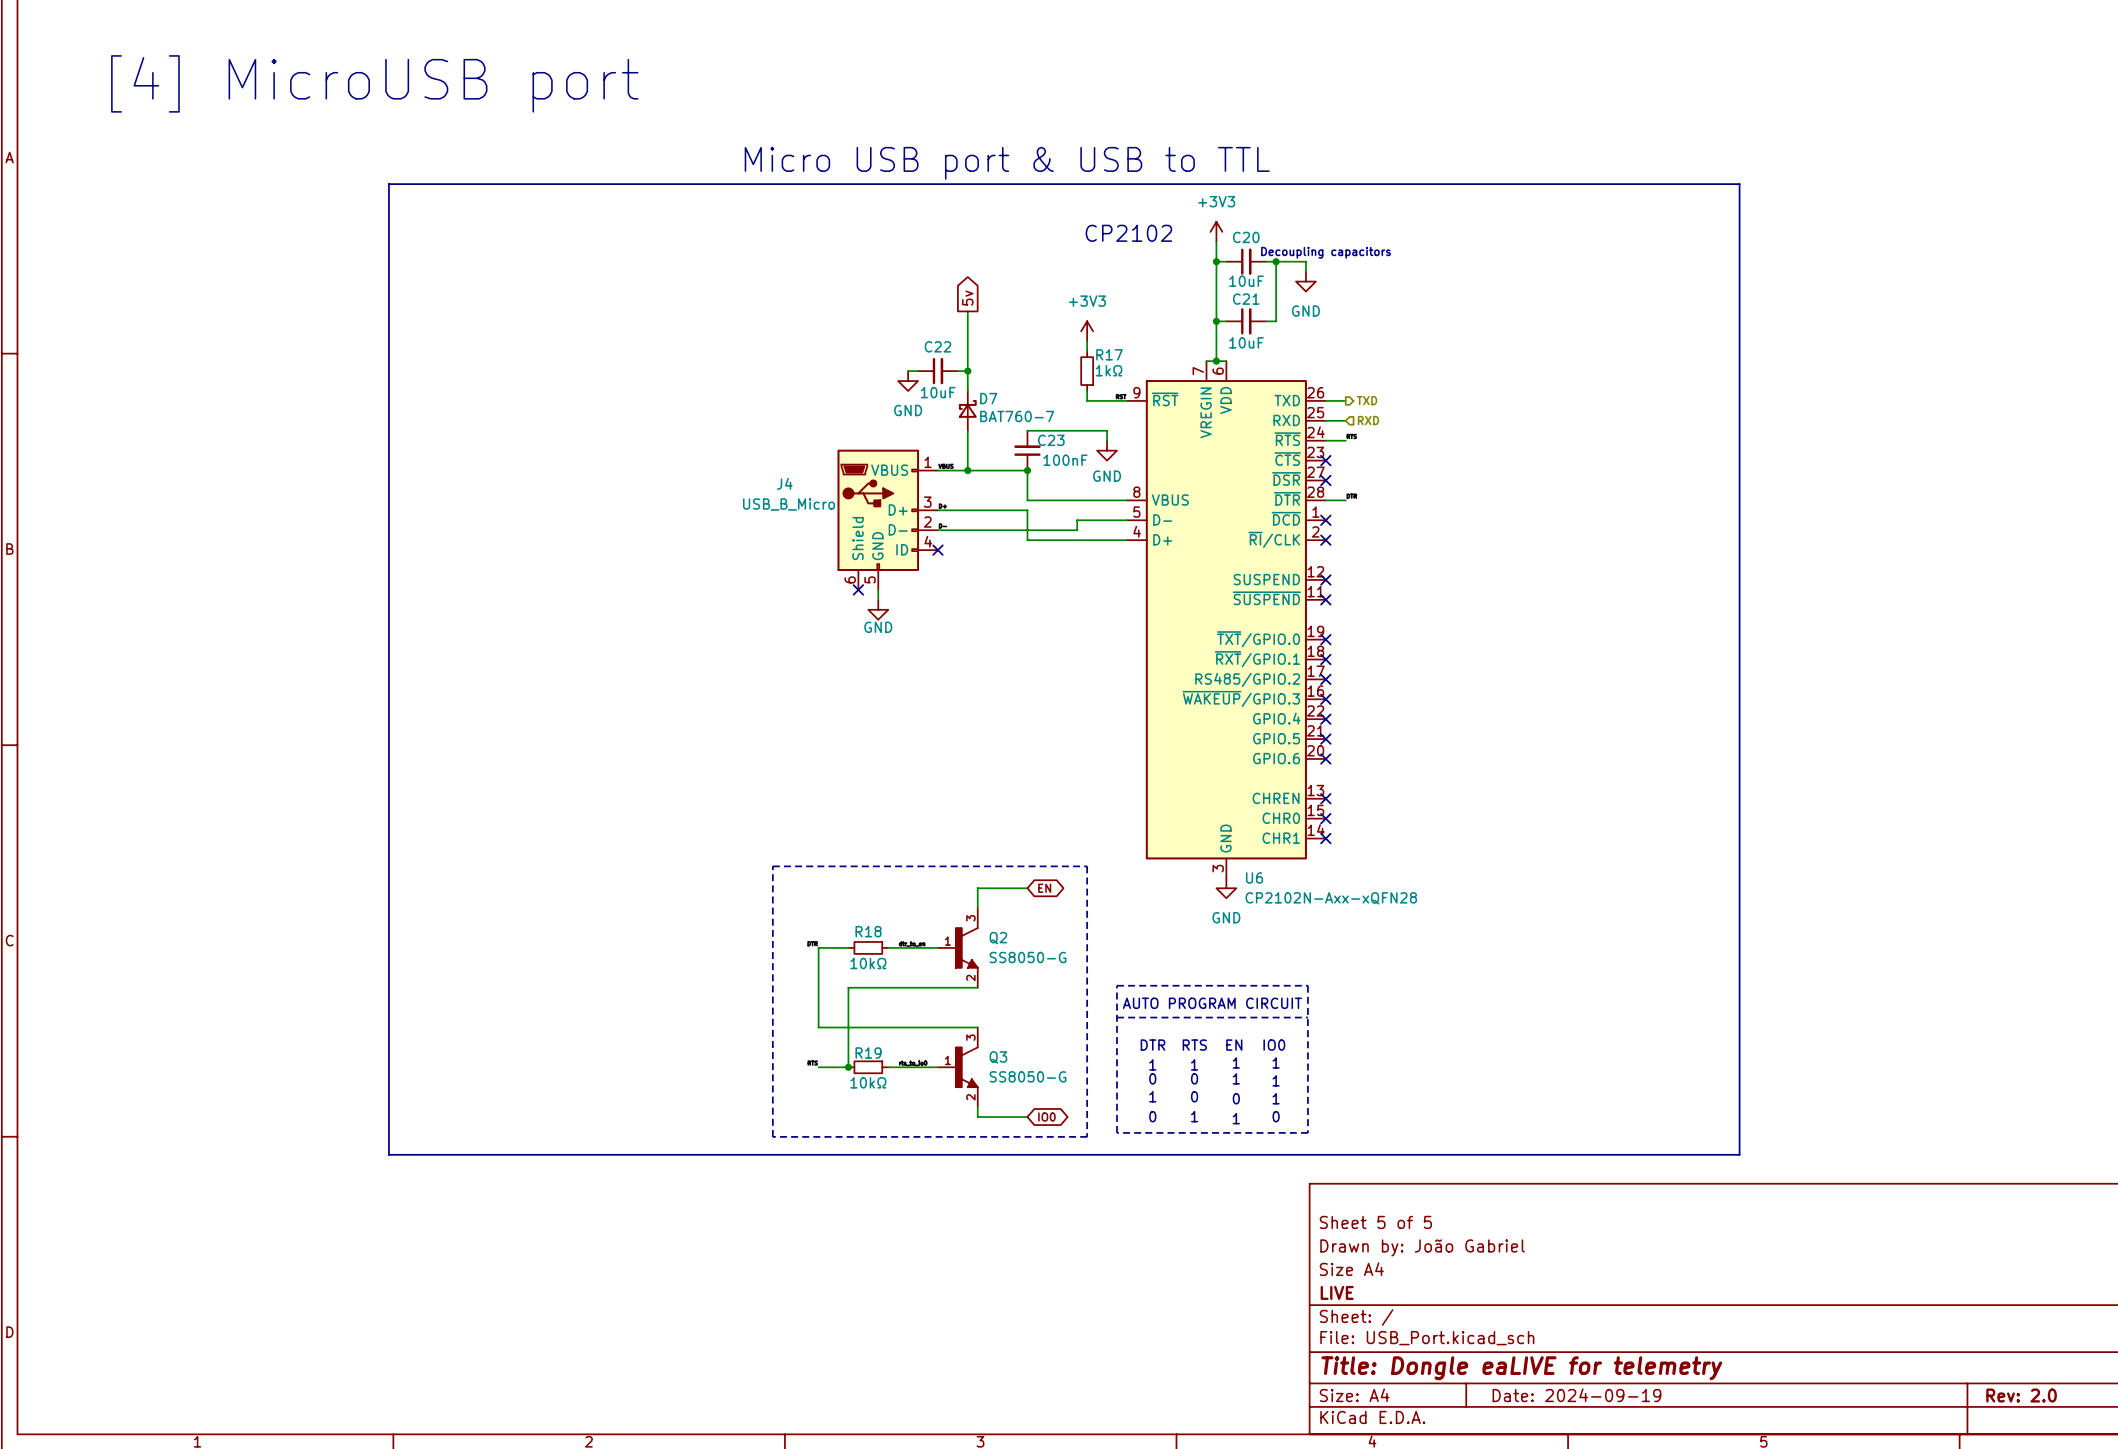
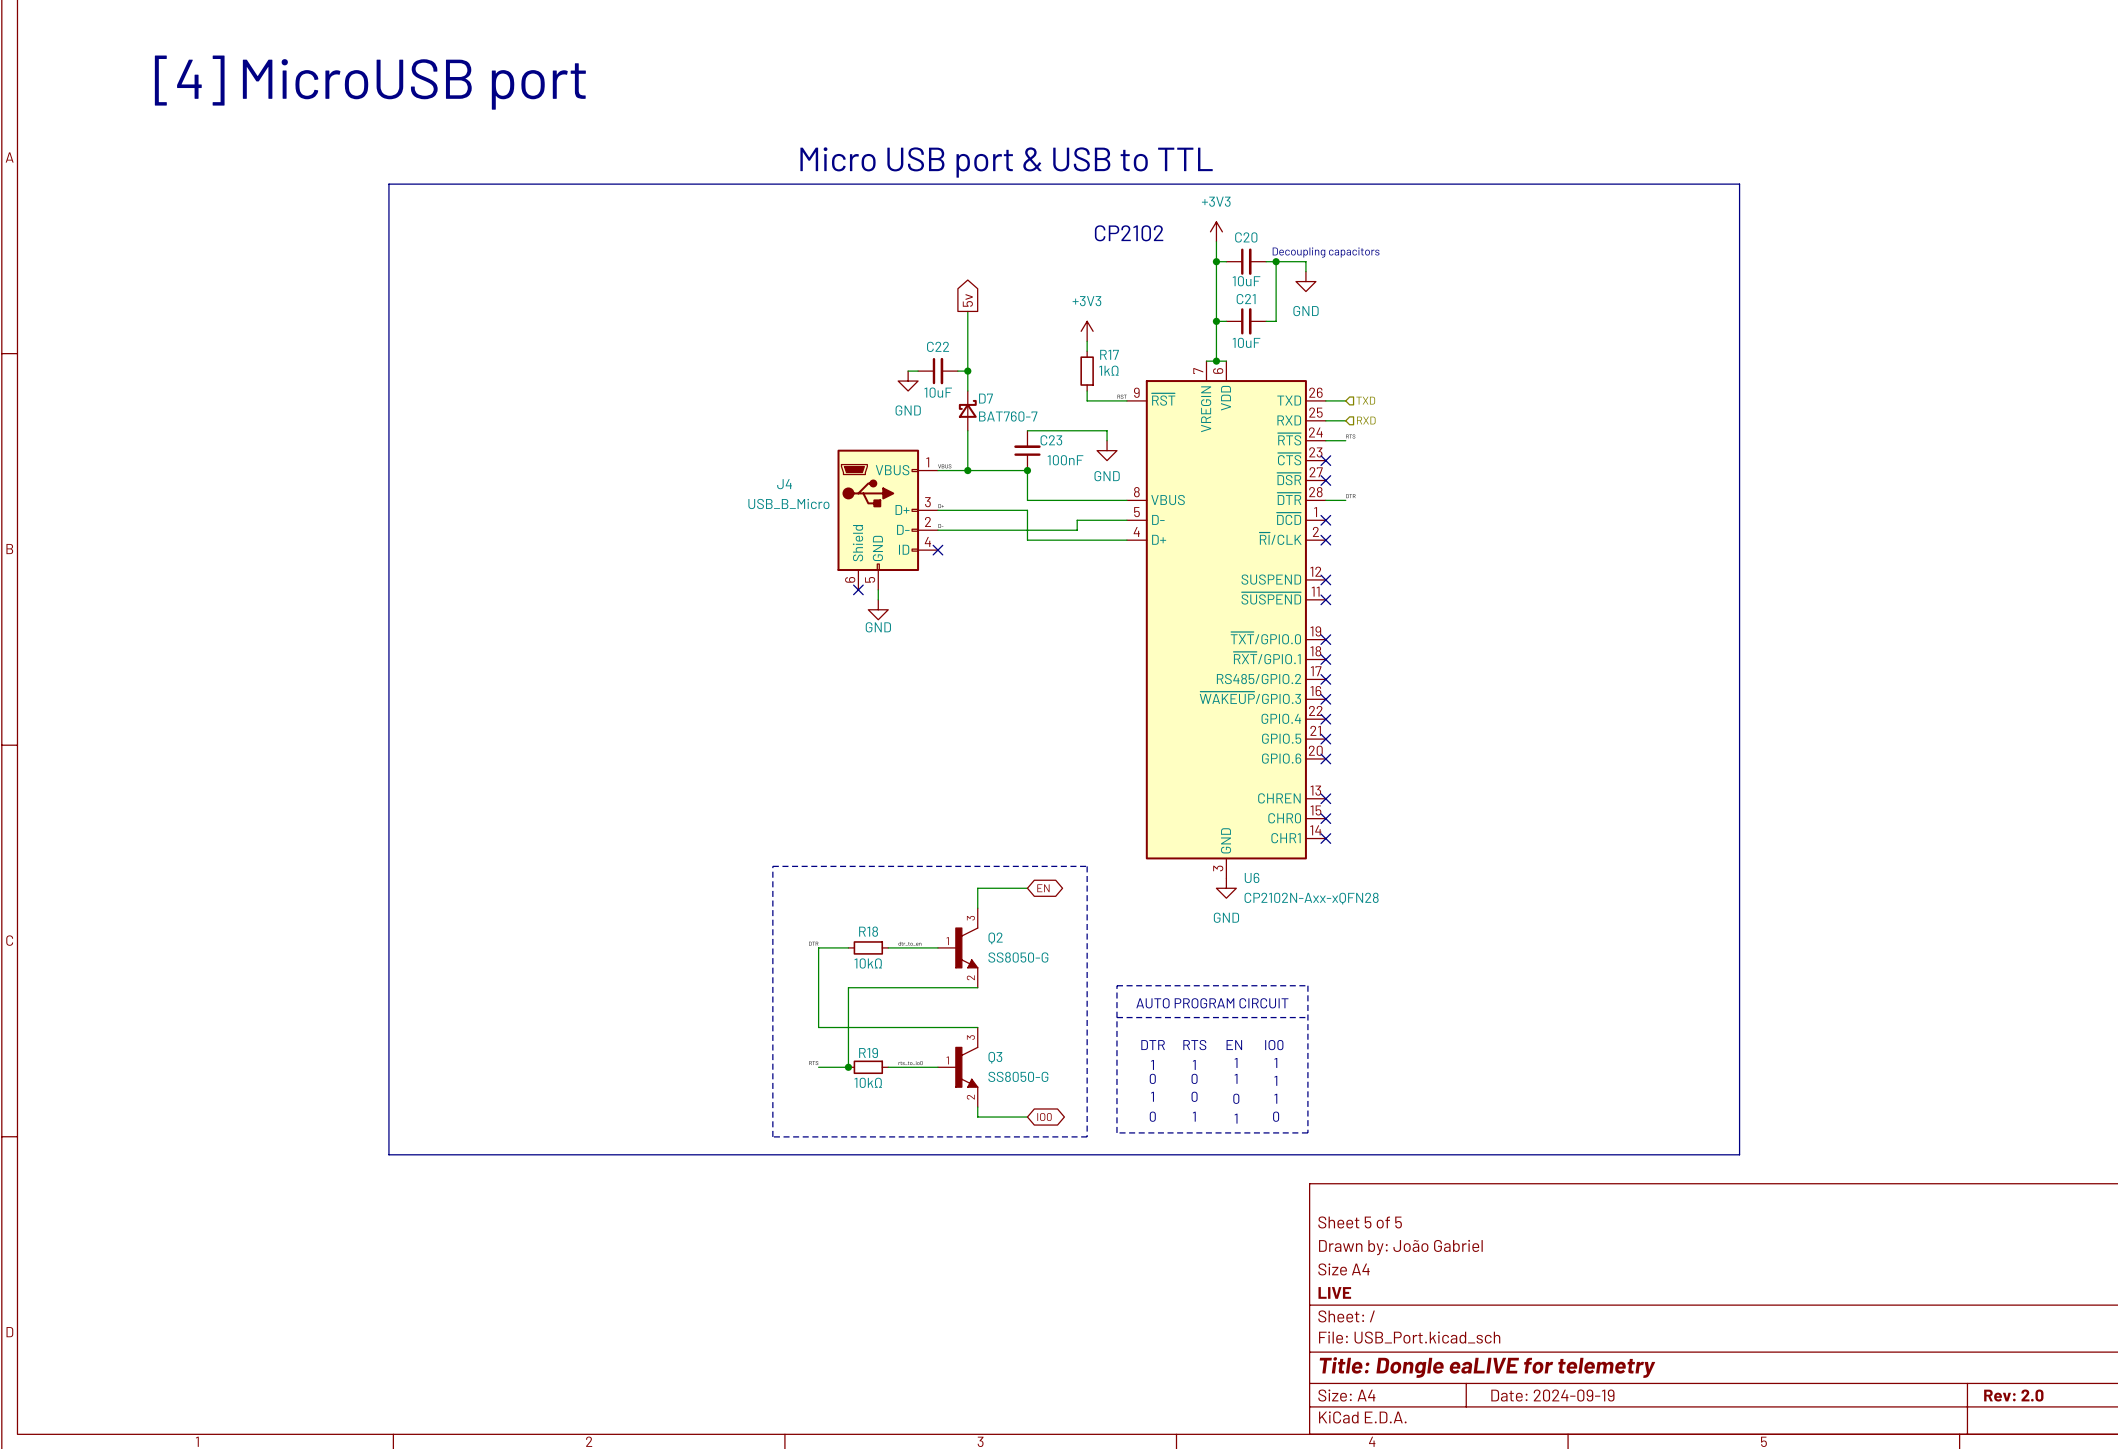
hierarchical label shape: output (1366, 400) -> input (1365, 400)

